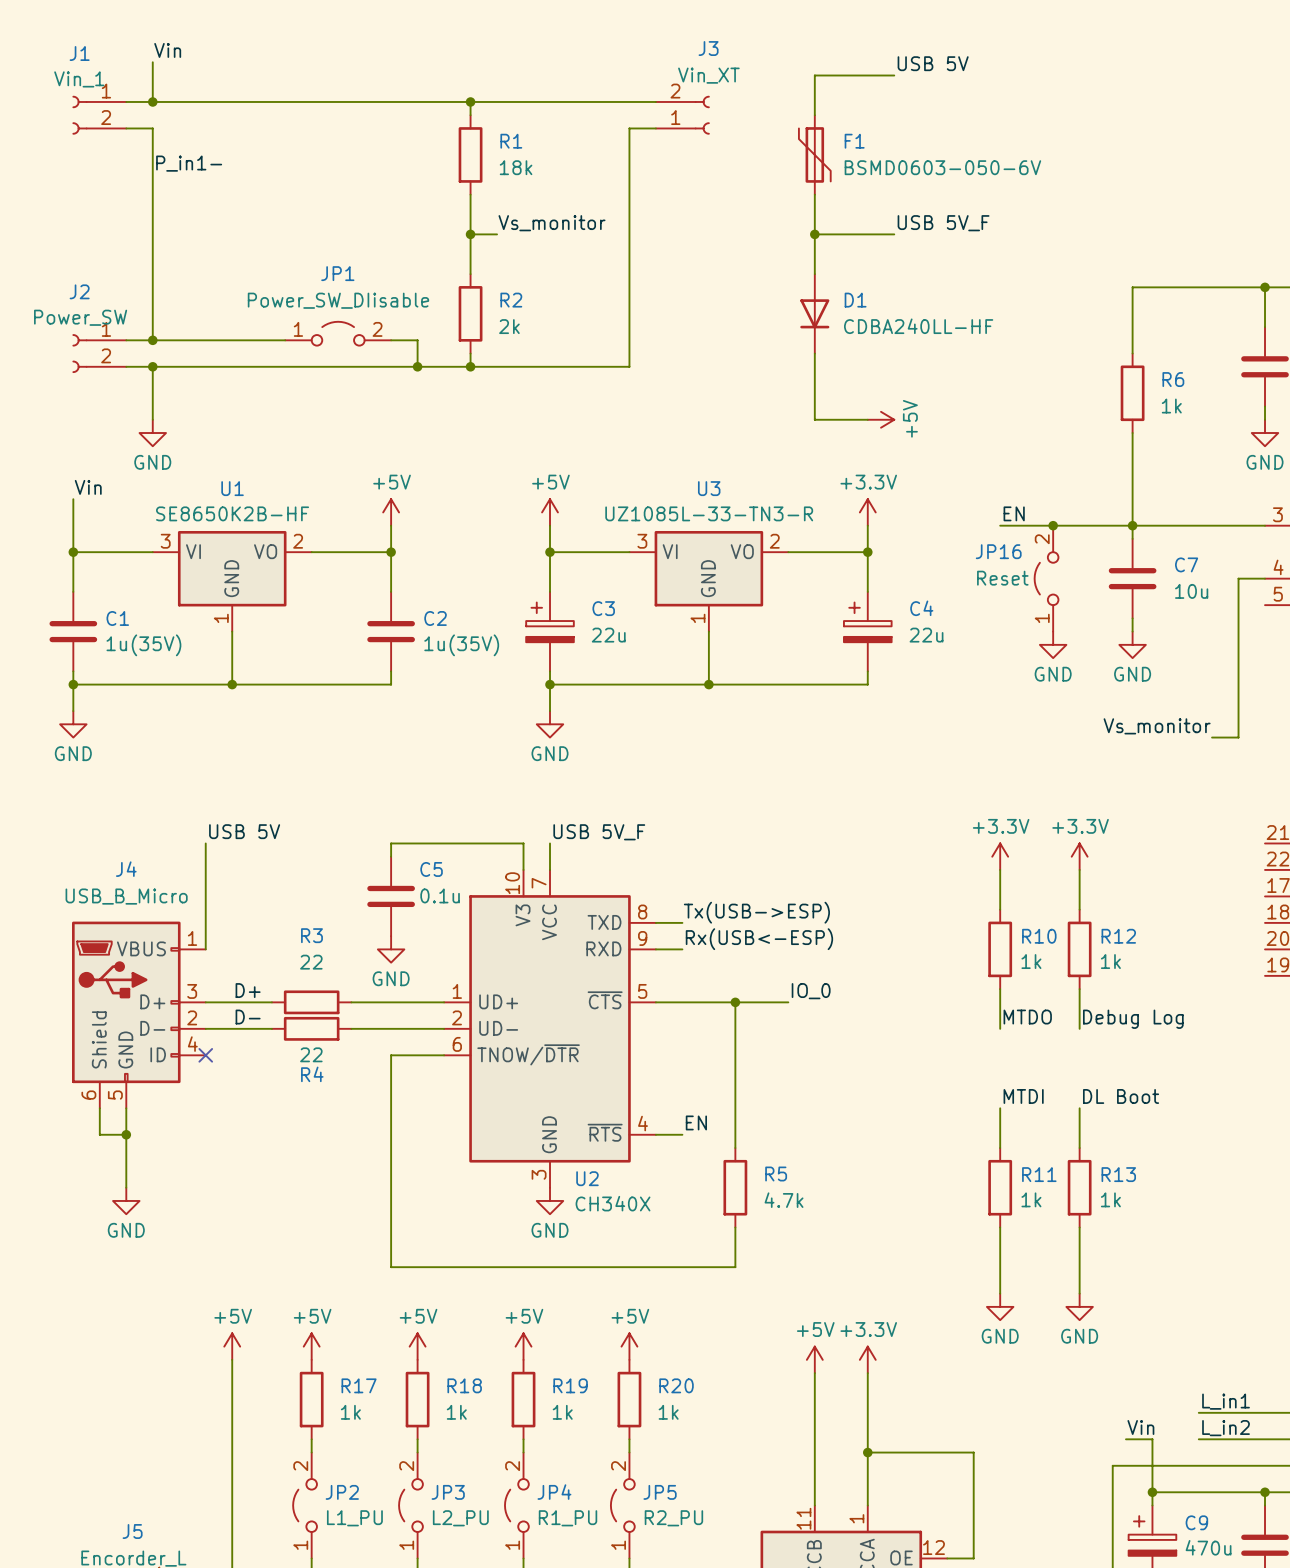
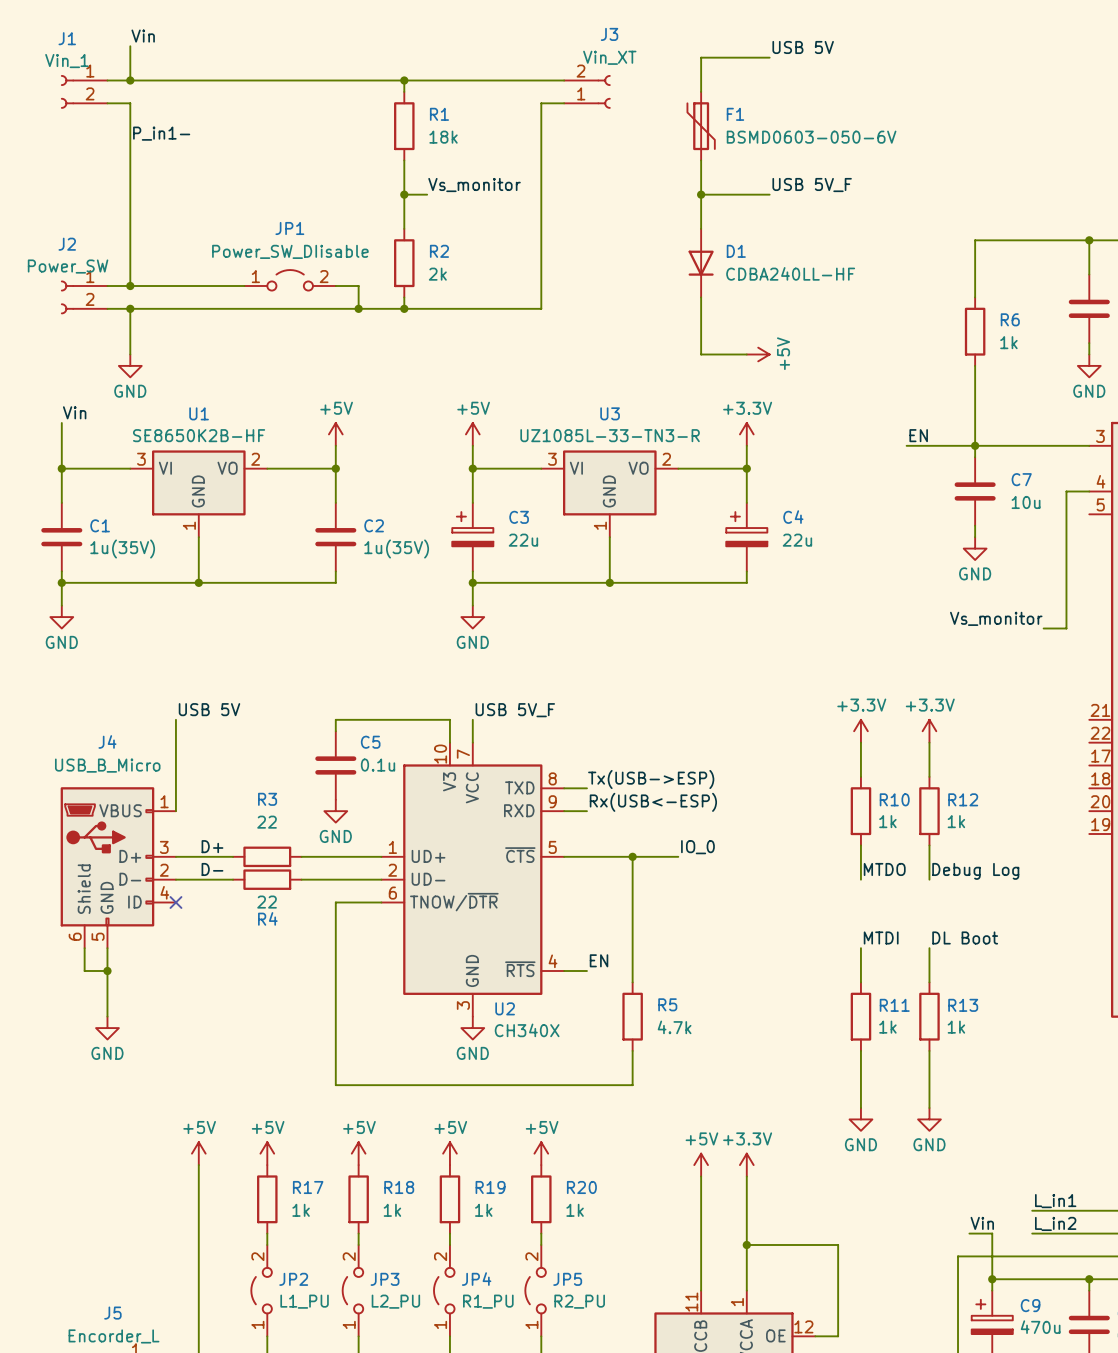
label position: EN (1014, 513) -> EN (918, 435)
wire: (1000, 525) (1053, 525) -> none
junction: (1053, 525) -> none
JP16: Reset (1046, 578) -> none
power symbol: GND (1053, 644) -> none

